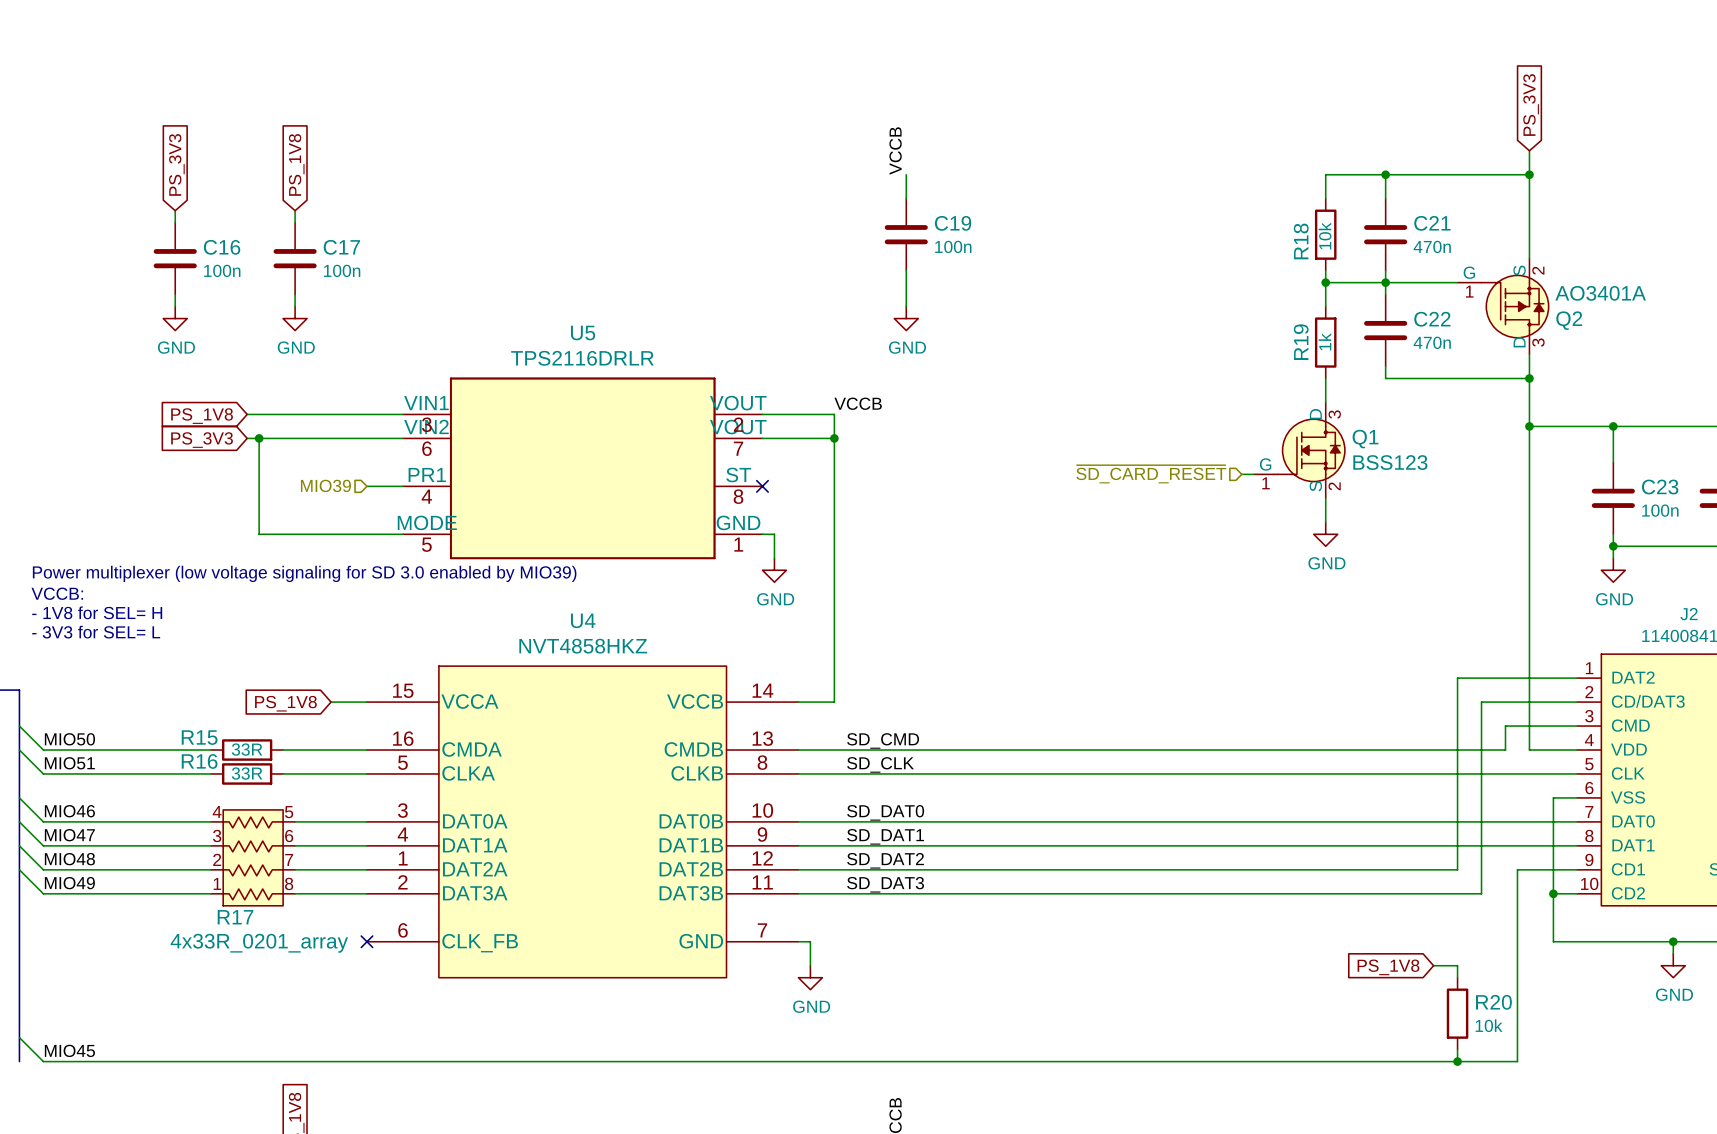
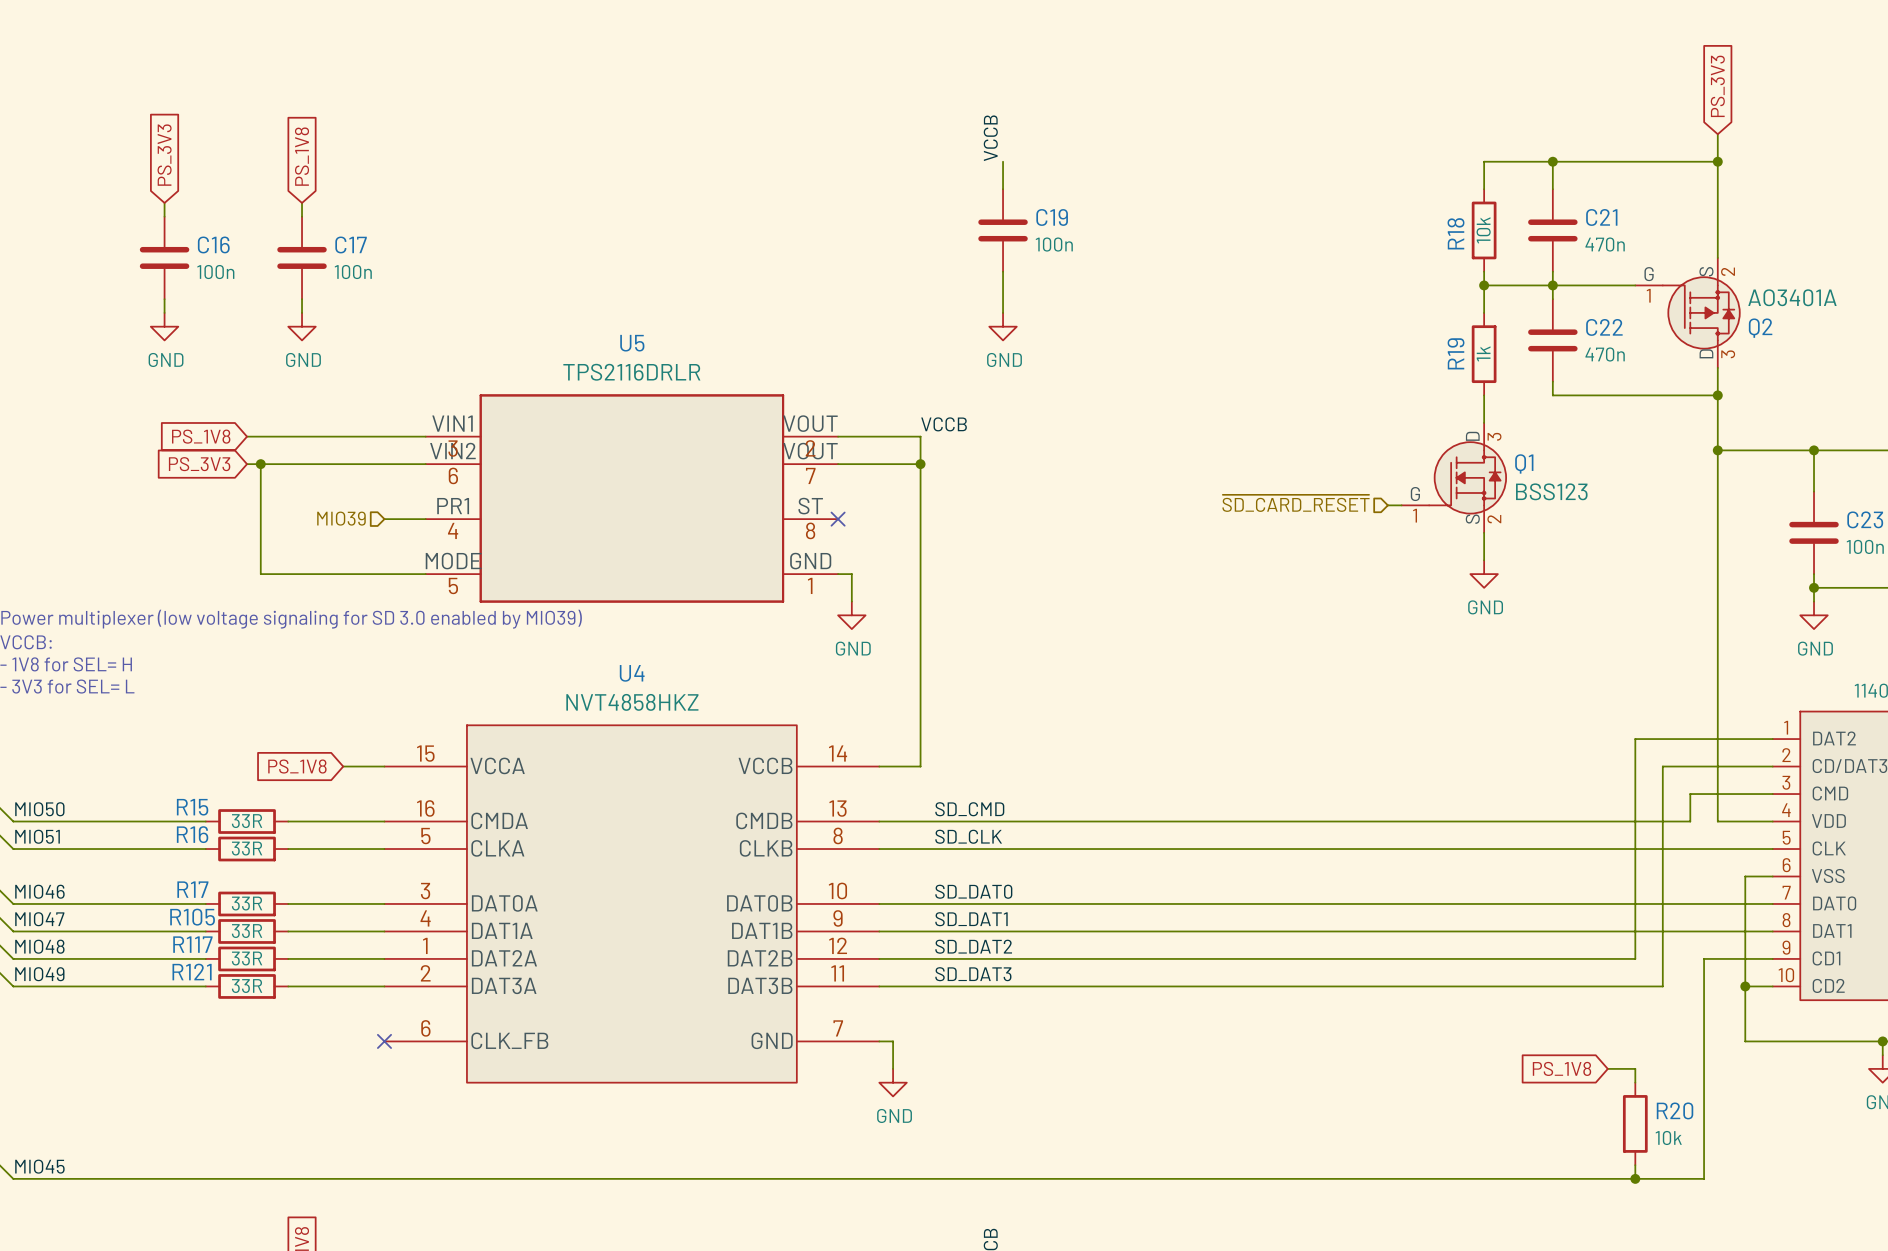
R17 symbol: [211, 809, 296, 906] -> [205, 891, 289, 917]
R17 text: none -> 33R (247, 903)
R105: none -> (247, 931)
R117: none -> (247, 958)
R121: none -> (247, 986)
R17 name position: R17 (235, 917) -> R17 (192, 889)
R17 value: 4x33R_0201_array (259, 943) -> none

